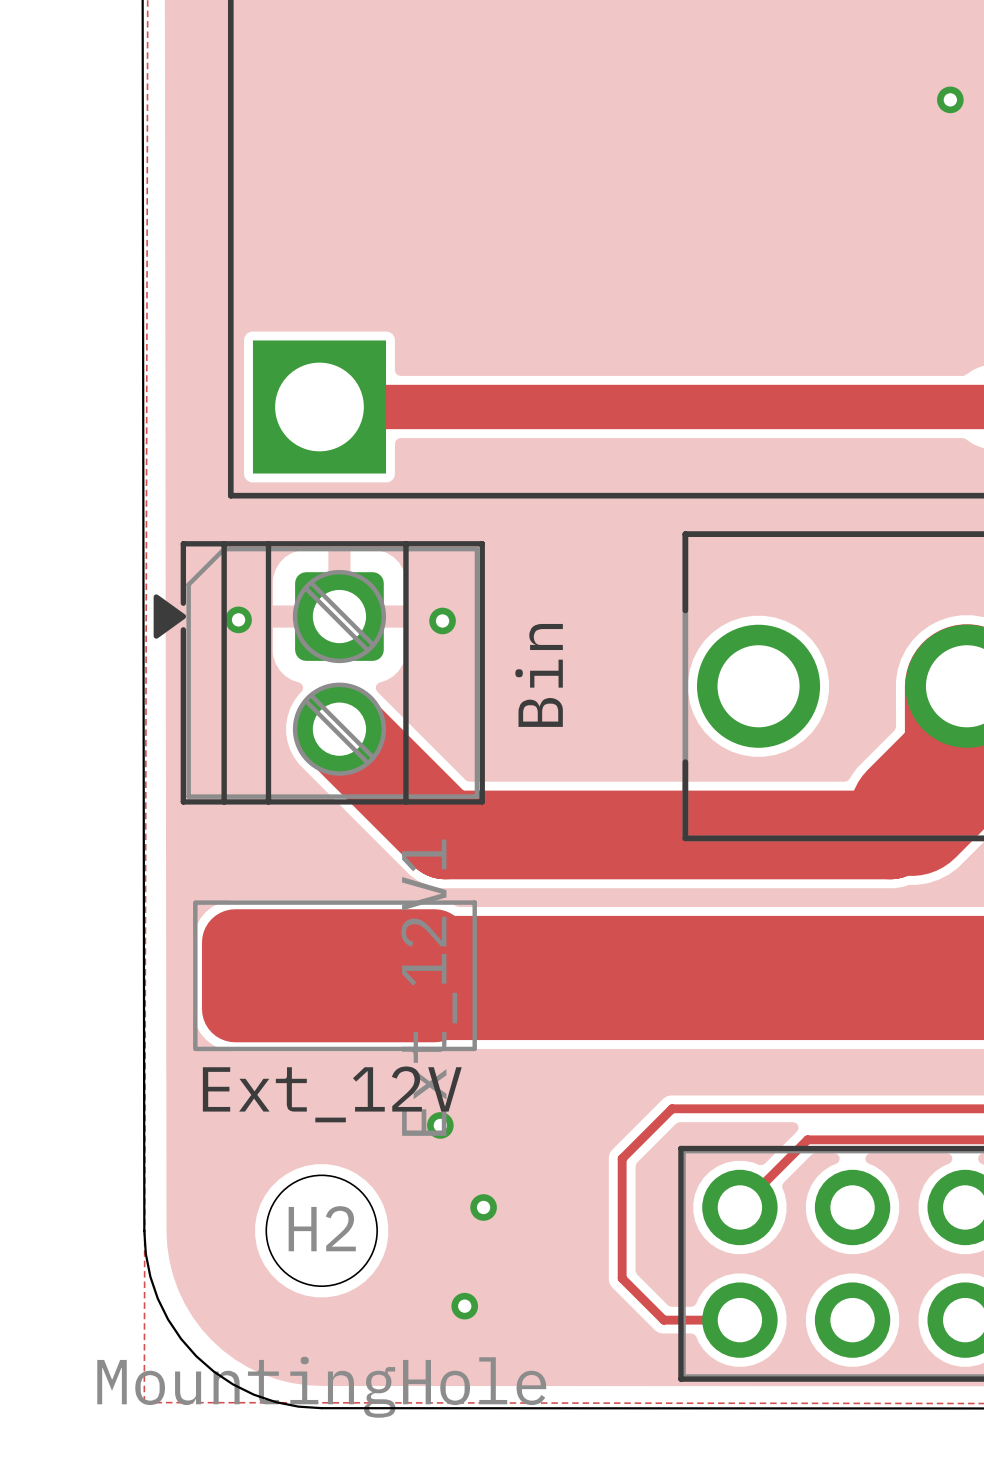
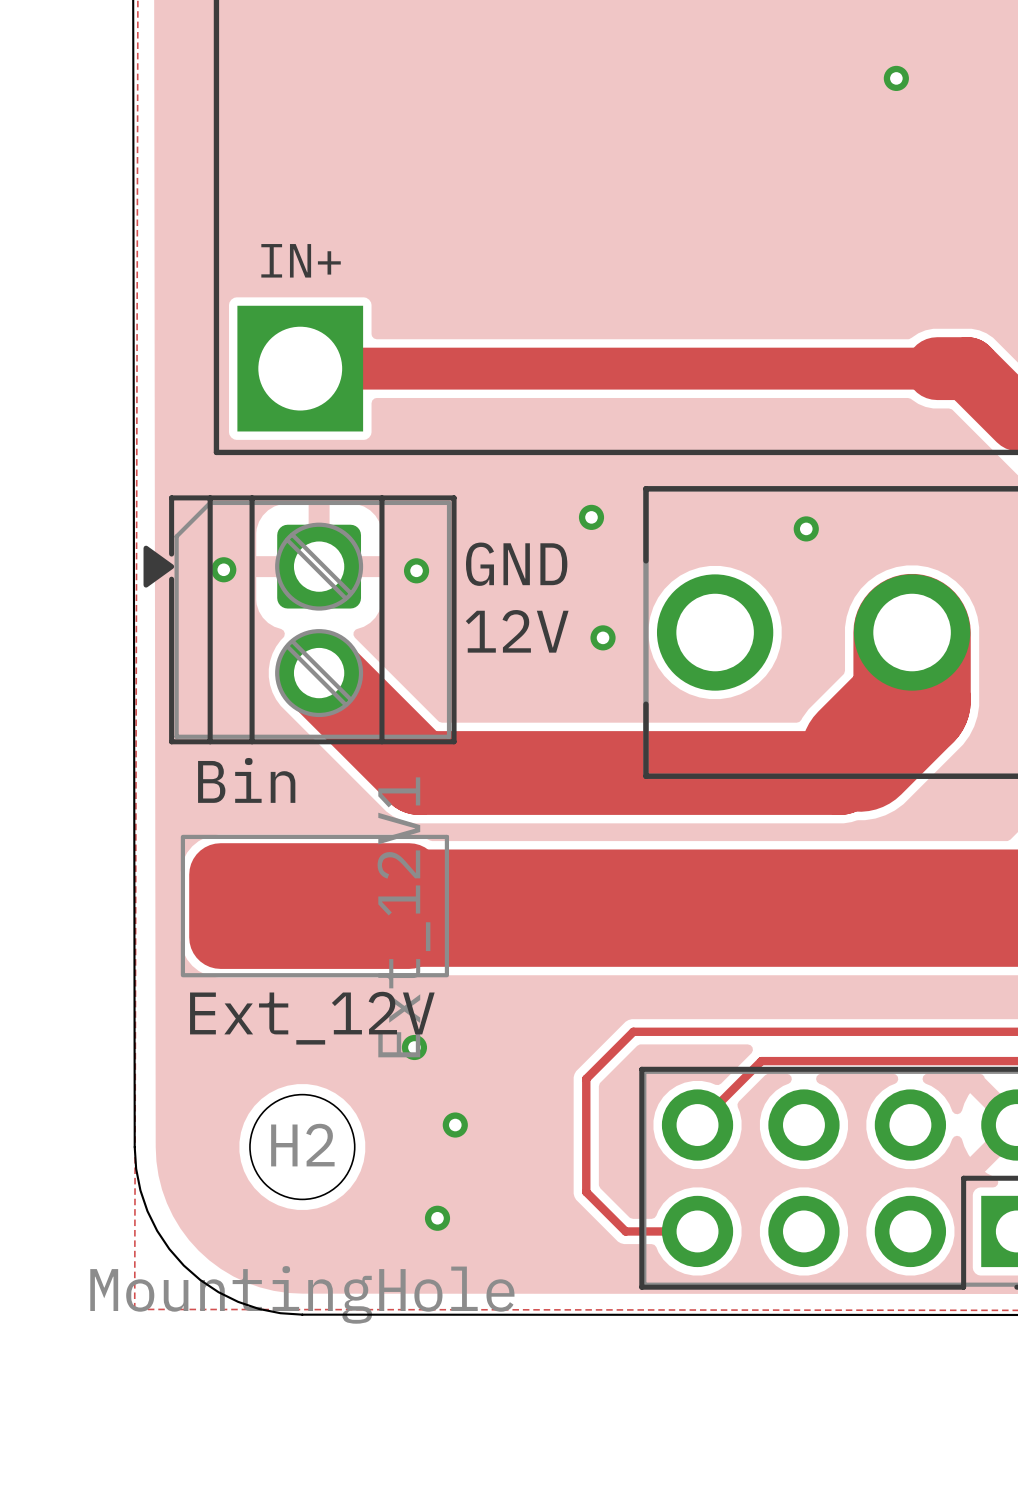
text: none -> IN+ (301, 260)
via: none -> (591, 517)
via: none -> (806, 528)
text: none -> GND (516, 564)
part value rotation: 0° (539, 675) -> 90° clockwise (246, 780)
part value position: Bin (539, 675) -> Bin (246, 780)
text: none -> 12V (517, 631)
via: none -> (603, 637)

